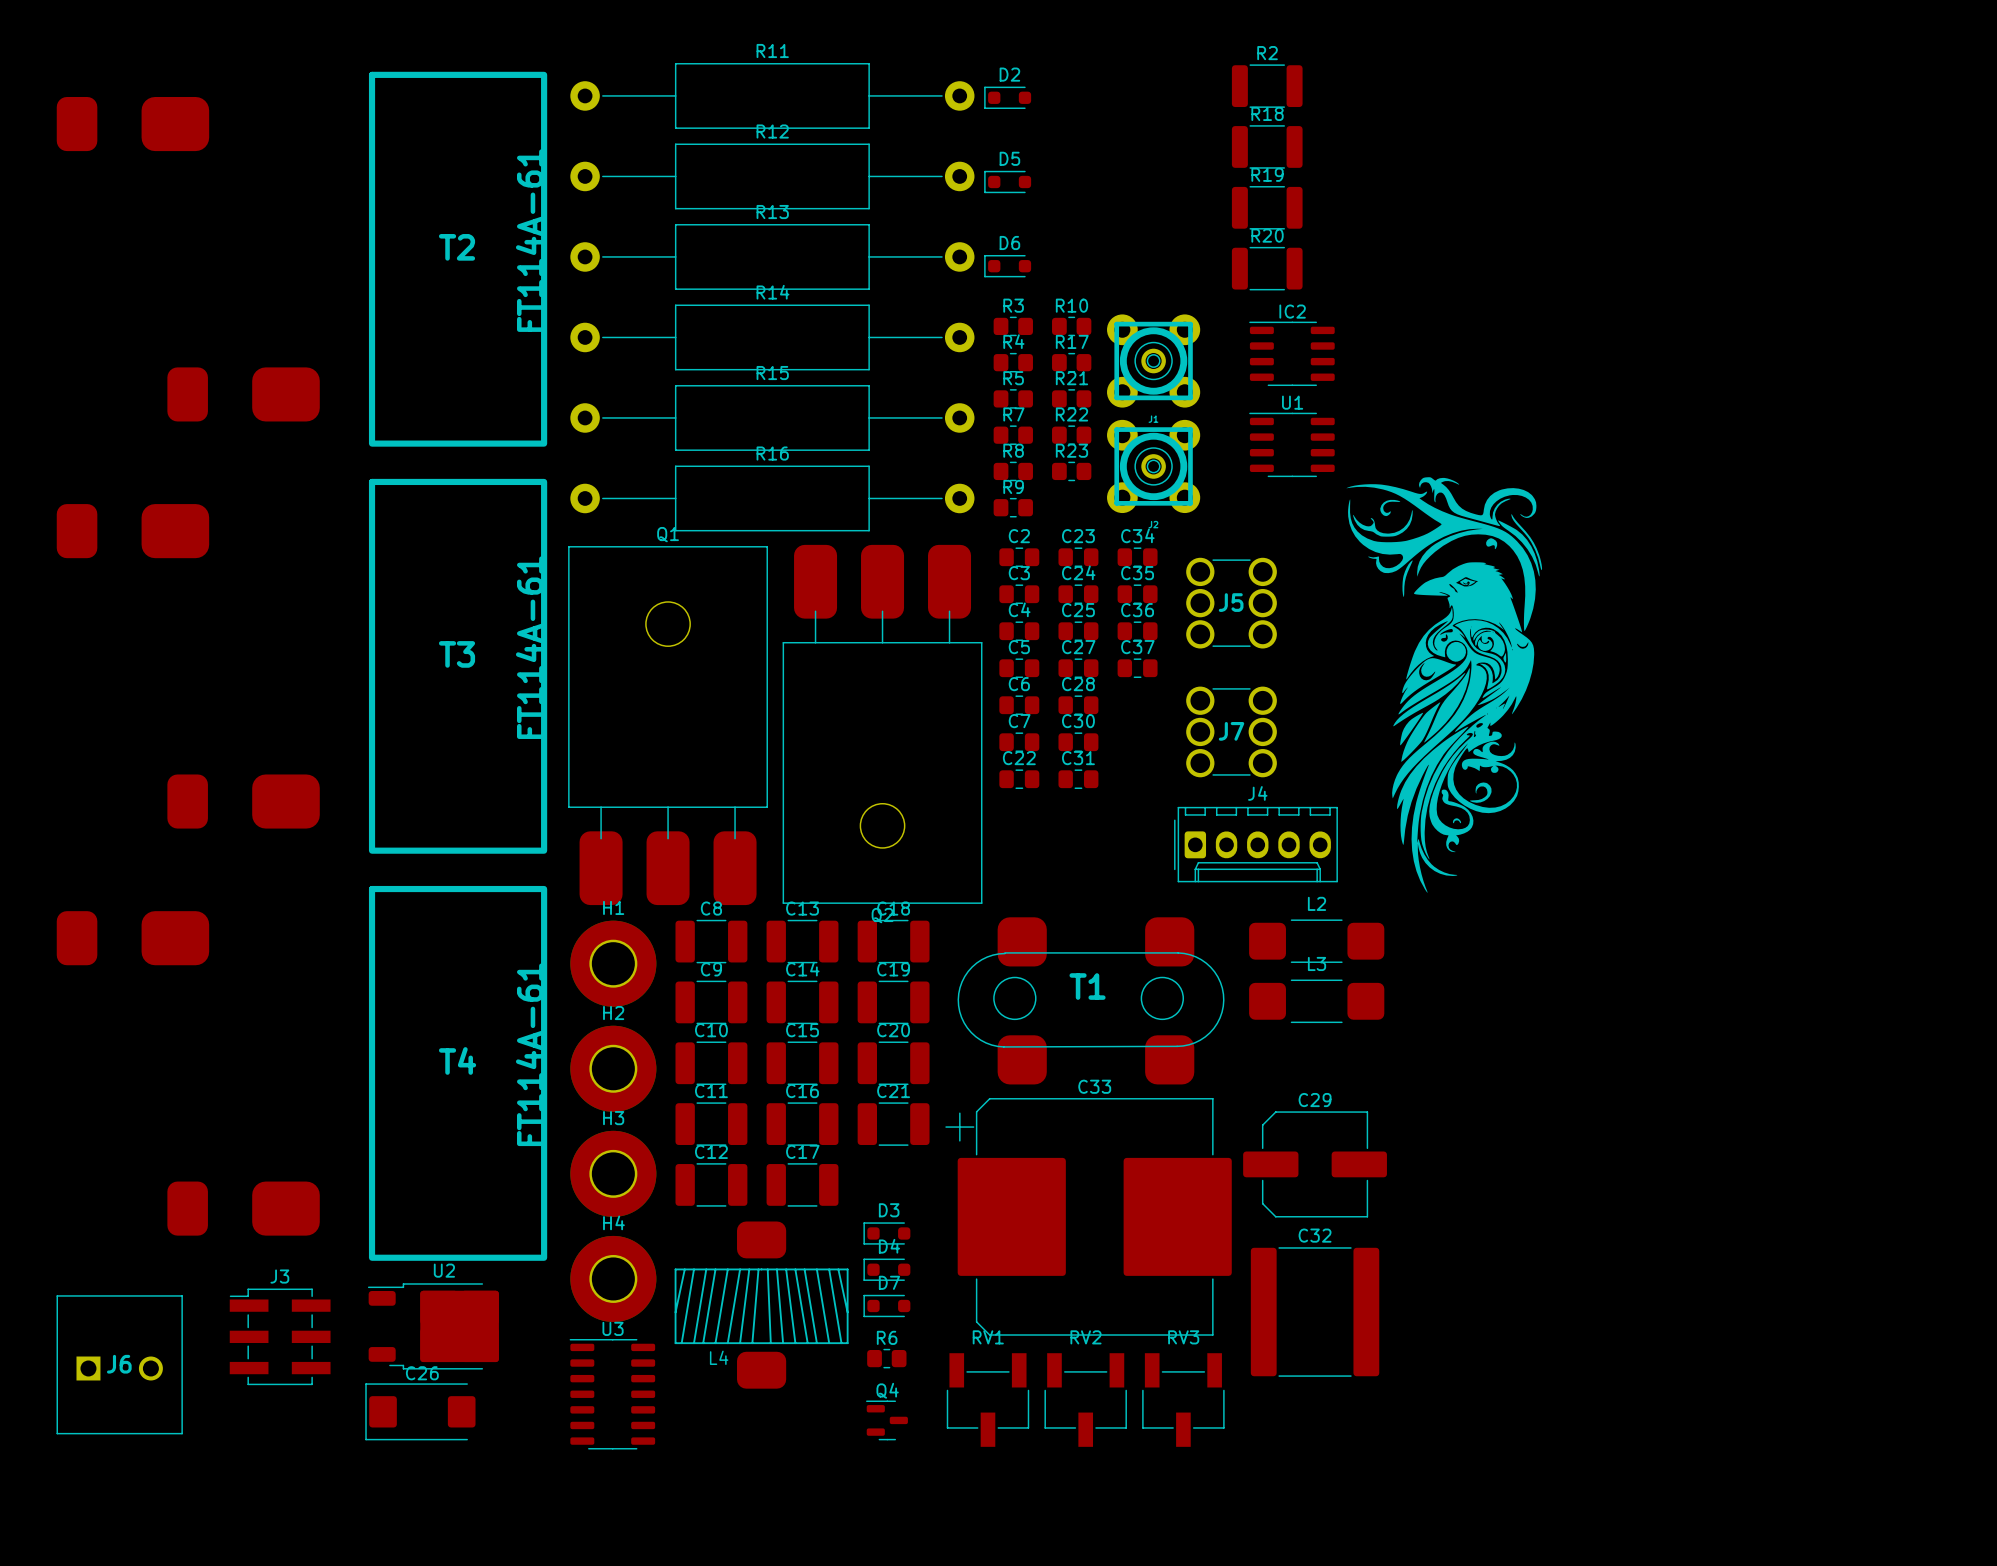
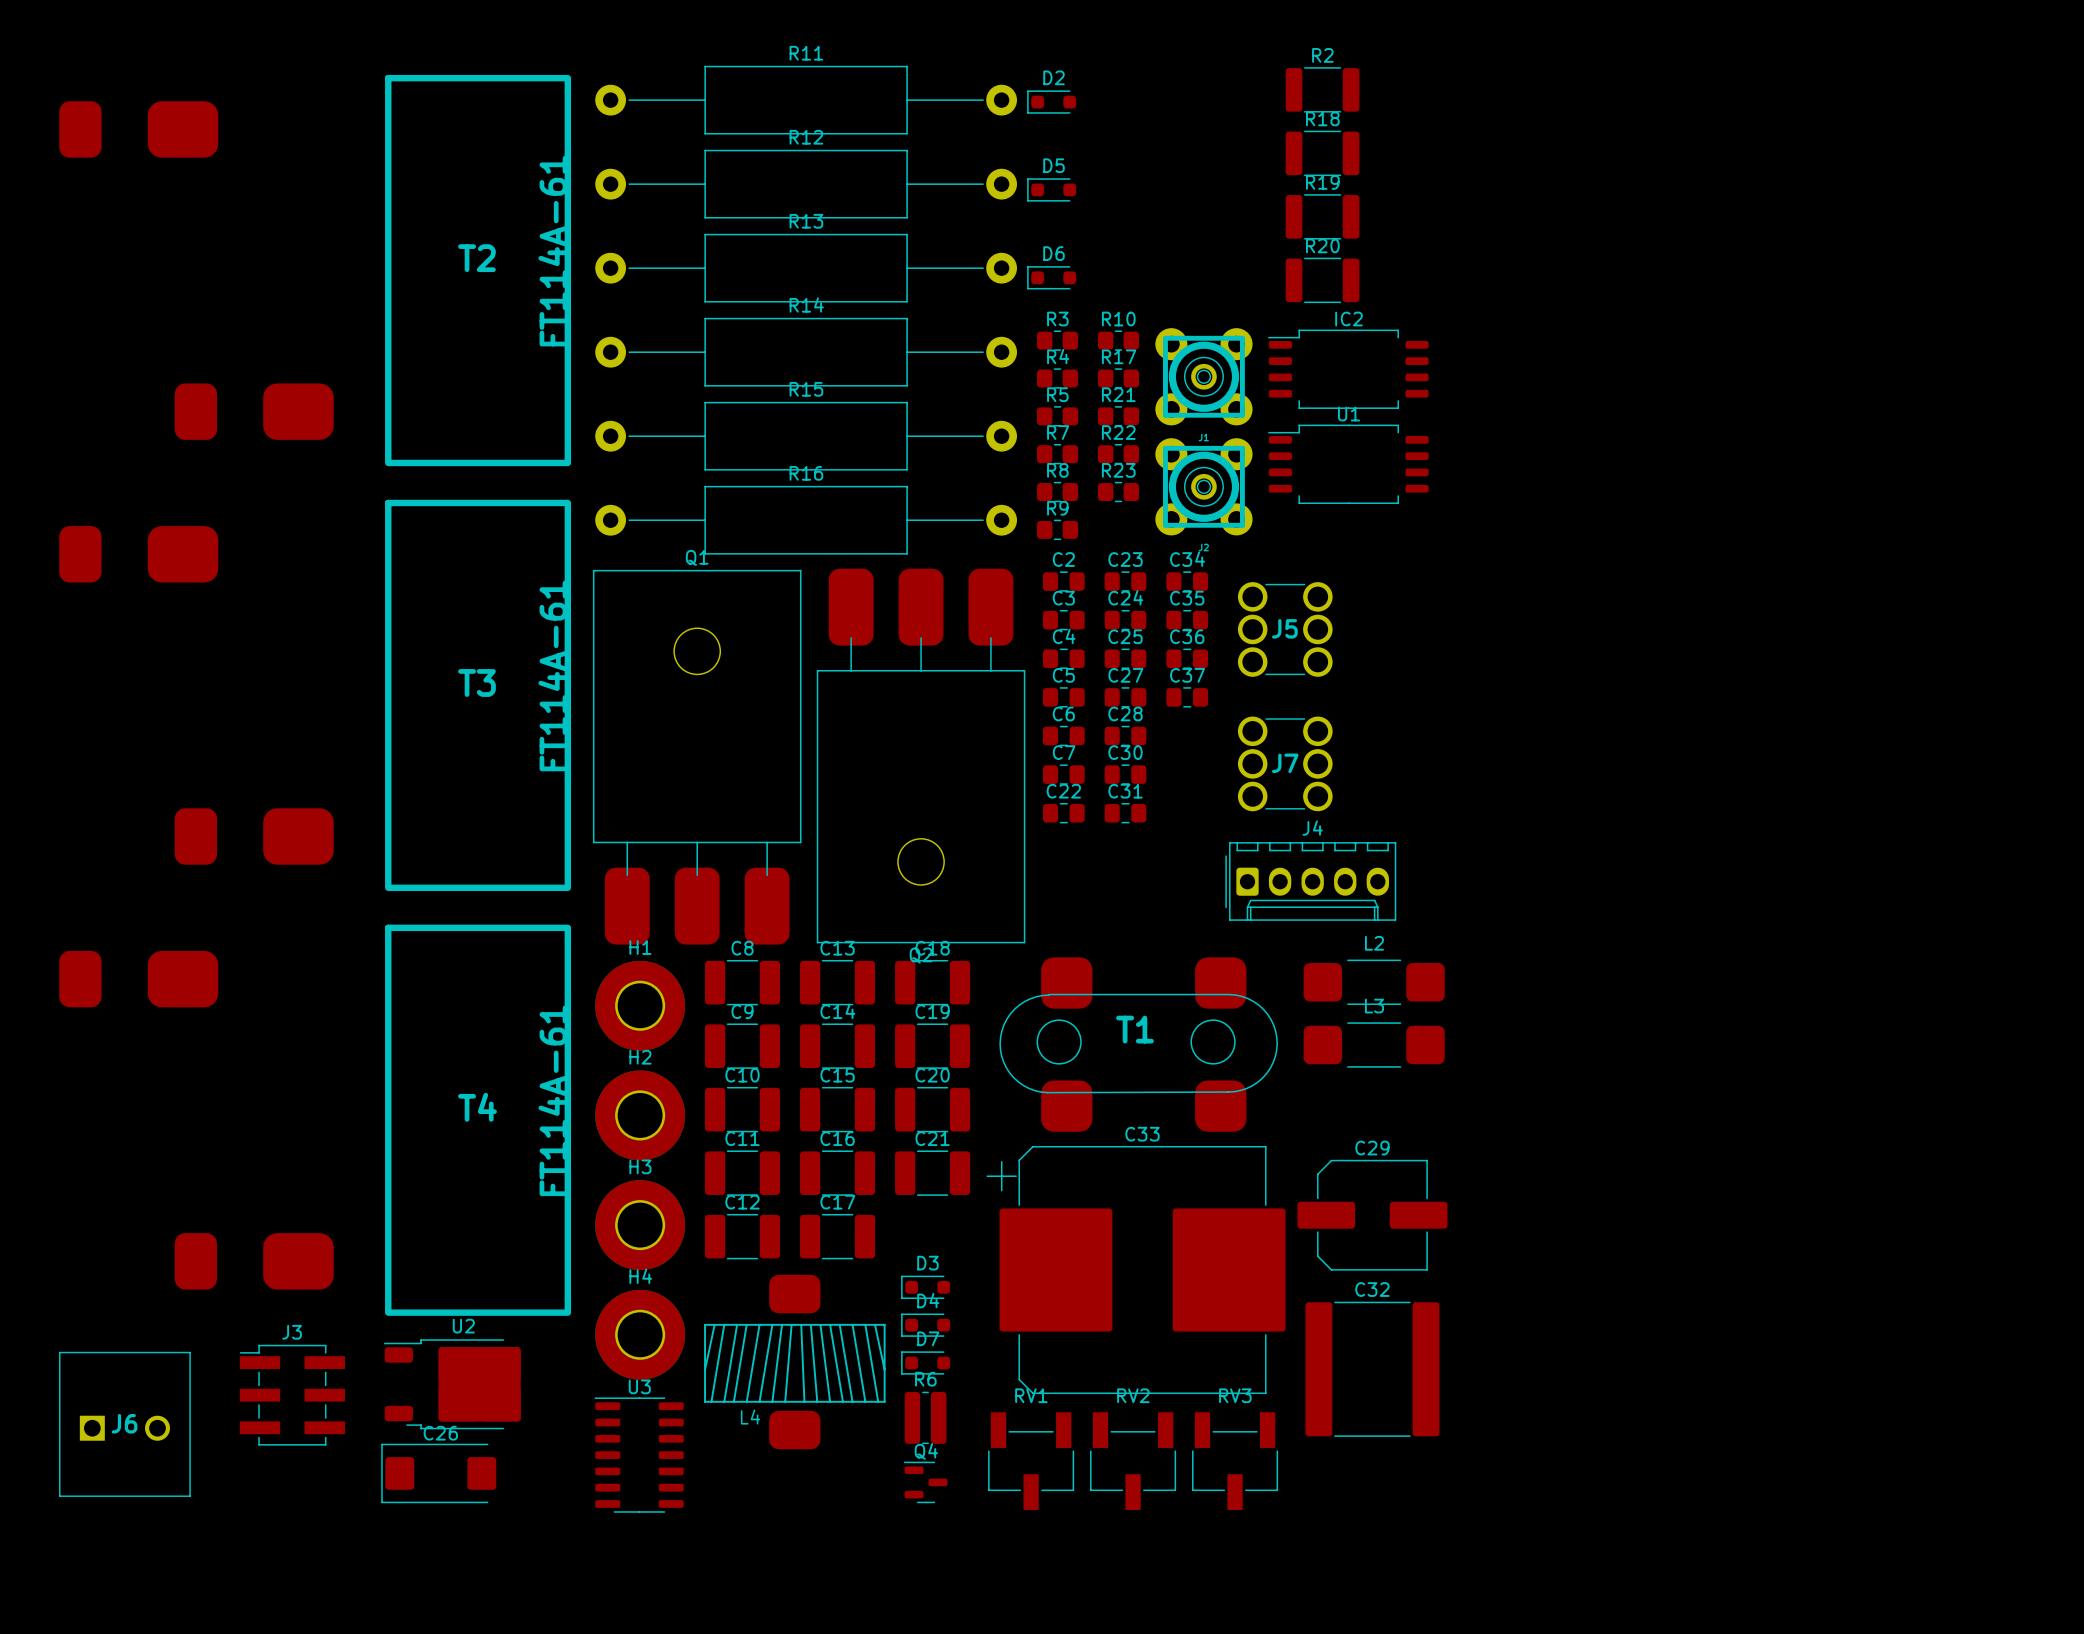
IC2 footprint: [1249, 321, 1335, 387] -> [1268, 329, 1429, 409]
U1 footprint: [1249, 412, 1335, 478] -> [1268, 424, 1429, 505]
drawing: [1346, 477, 1543, 893] -> none
R6 footprint: [867, 1348, 907, 1369] -> [904, 1391, 947, 1445]

